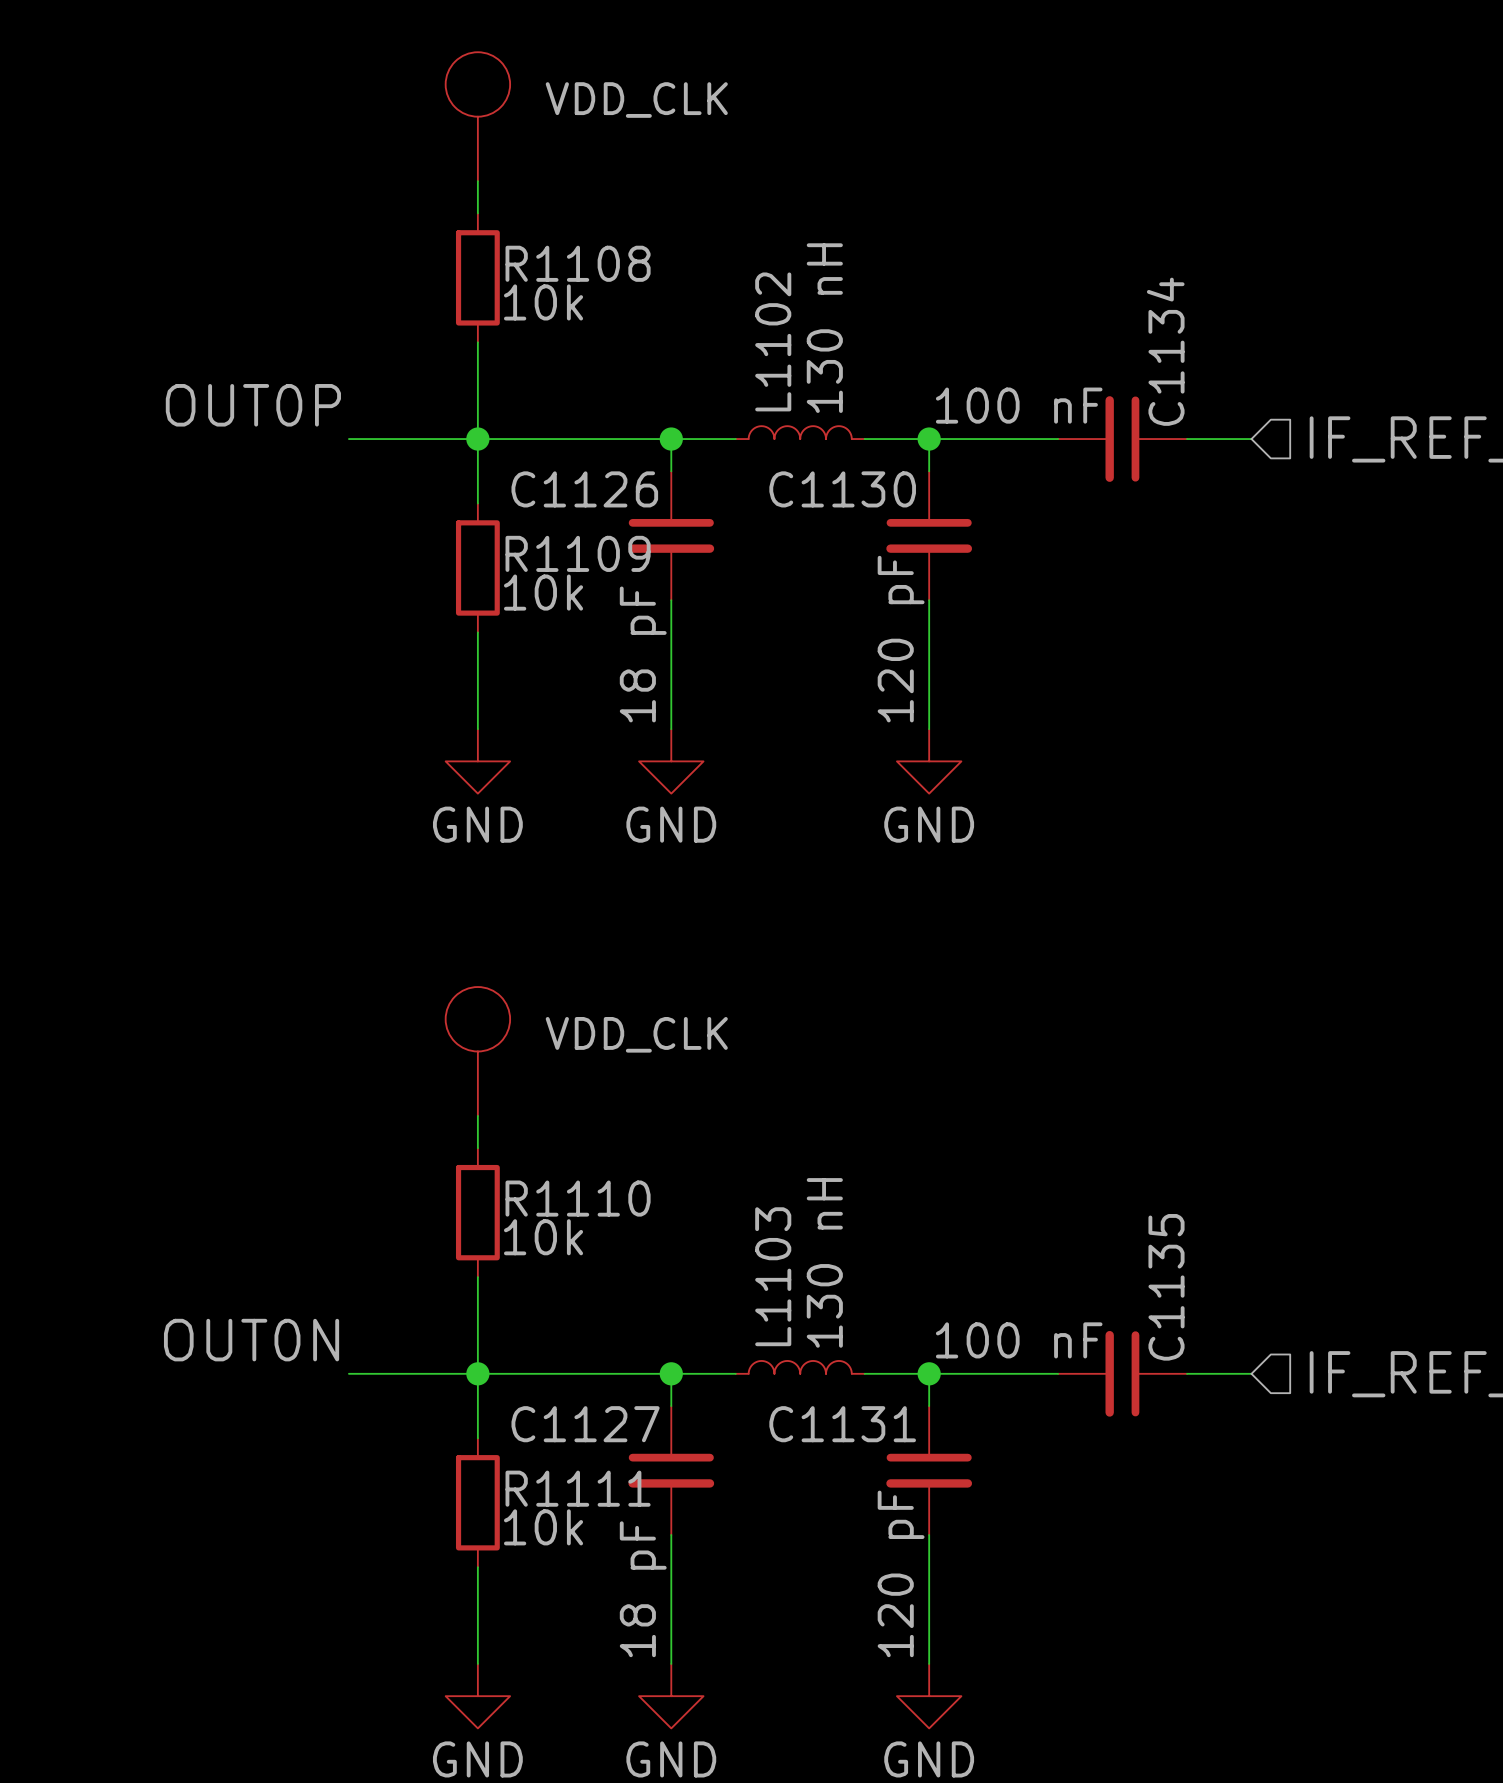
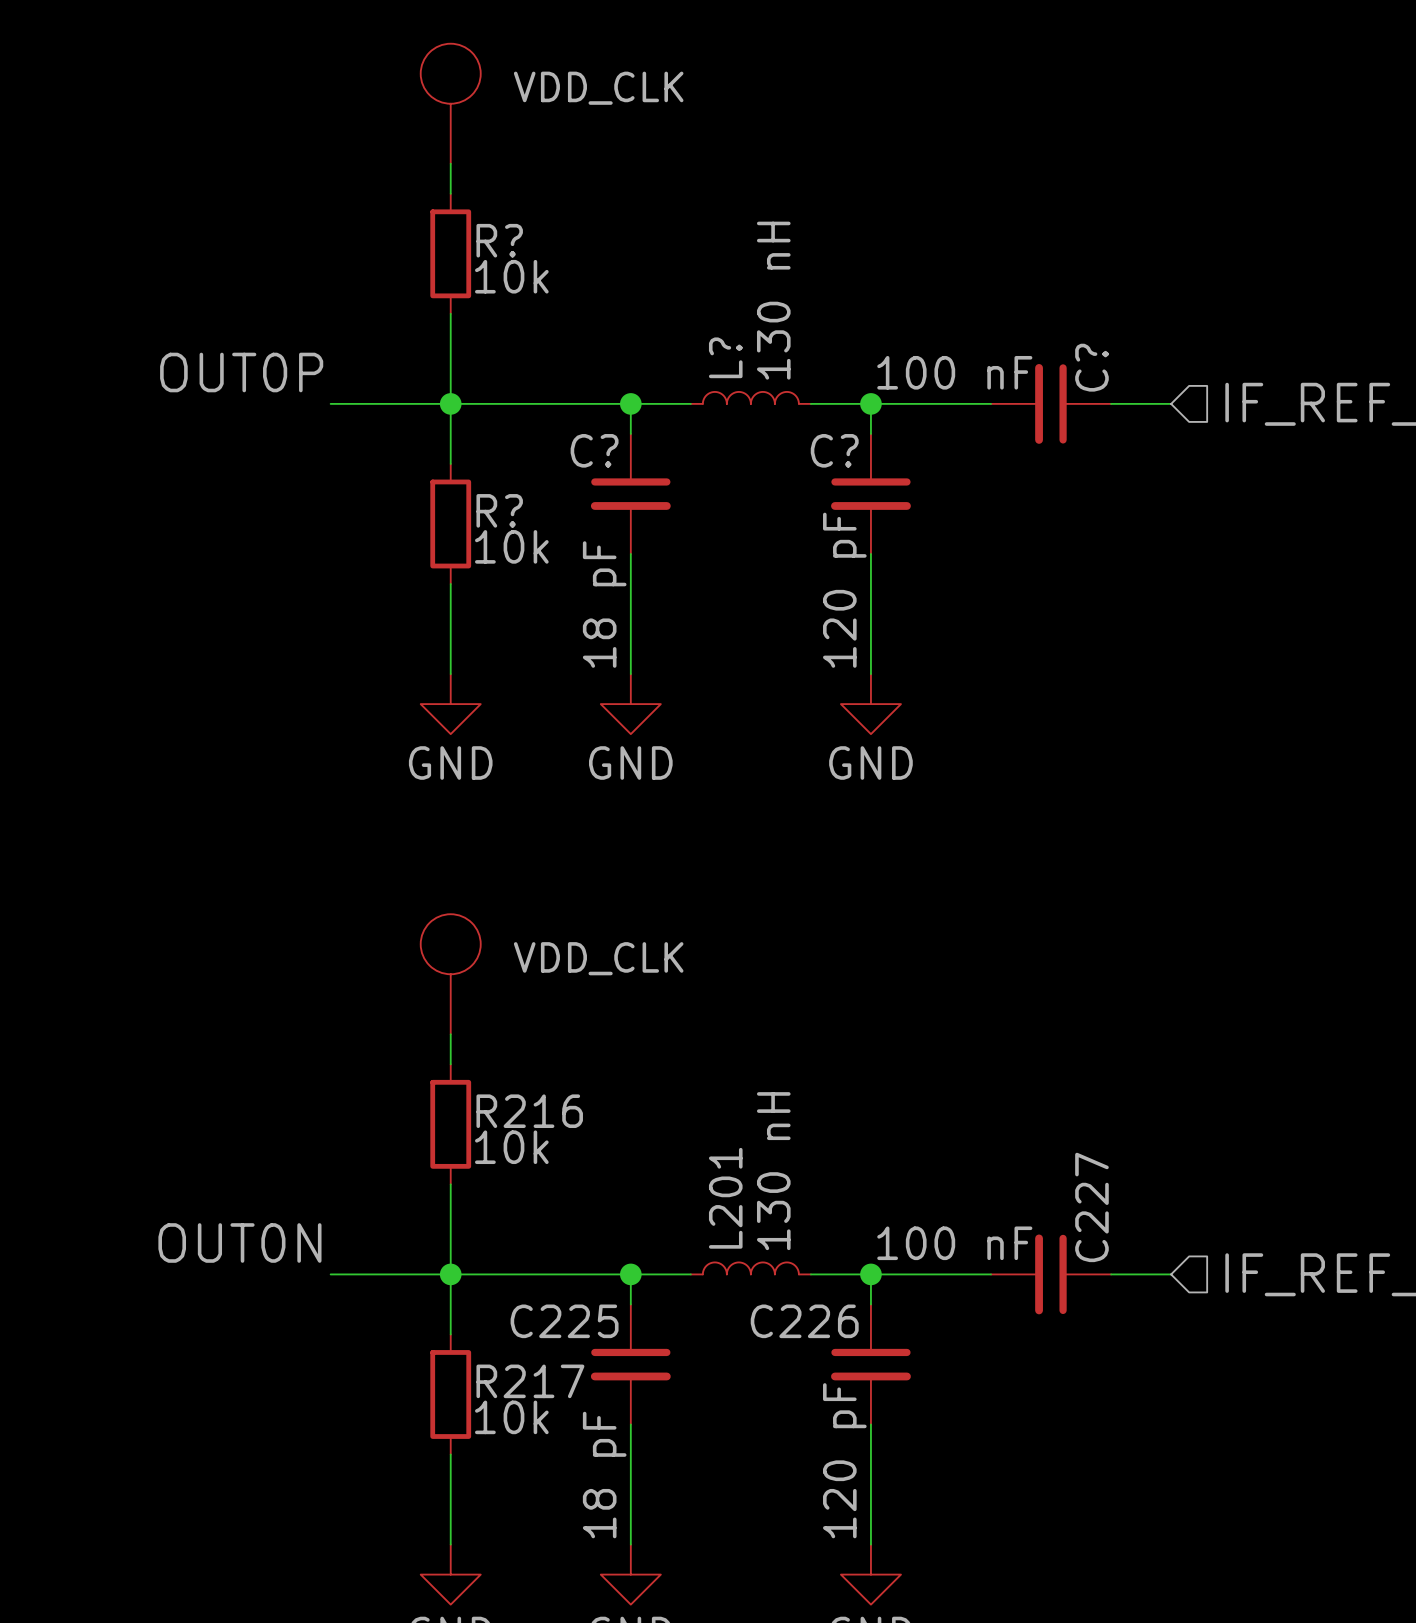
R1108 name: R1108 (578, 263) -> R? (499, 240)
L1102 name: L1102 (773, 341) -> L? (725, 357)
C1134 name: C1134 (1165, 351) -> C? (1091, 367)
C1126 name: C1126 (584, 489) -> C? (594, 450)
C1130 name: C1130 (842, 489) -> C? (834, 450)
R1109 name: R1109 (578, 553) -> R? (499, 510)
R1110 name: R1110 (578, 1198) -> R216 (529, 1111)
L1103 name: L1103 (773, 1276) -> L201 (725, 1198)
C1135 name: C1135 (1166, 1287) -> C227 (1091, 1207)
C1127 name: C1127 (585, 1424) -> C225 (564, 1321)
C1131 name: C1131 (842, 1424) -> C226 (804, 1321)
R1111 name: R1111 (578, 1488) -> R217 (530, 1381)

